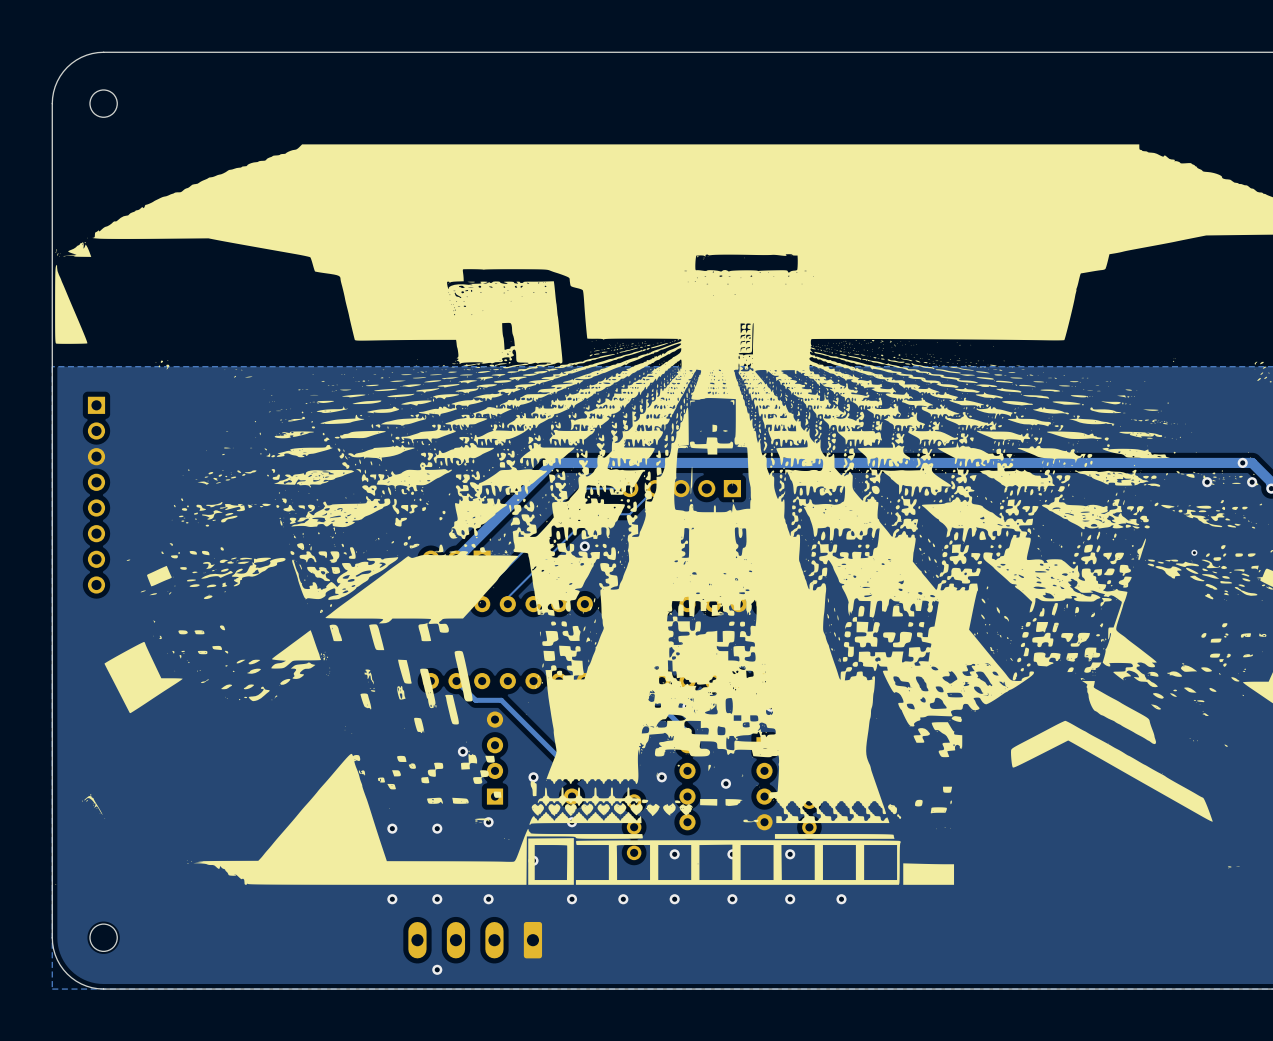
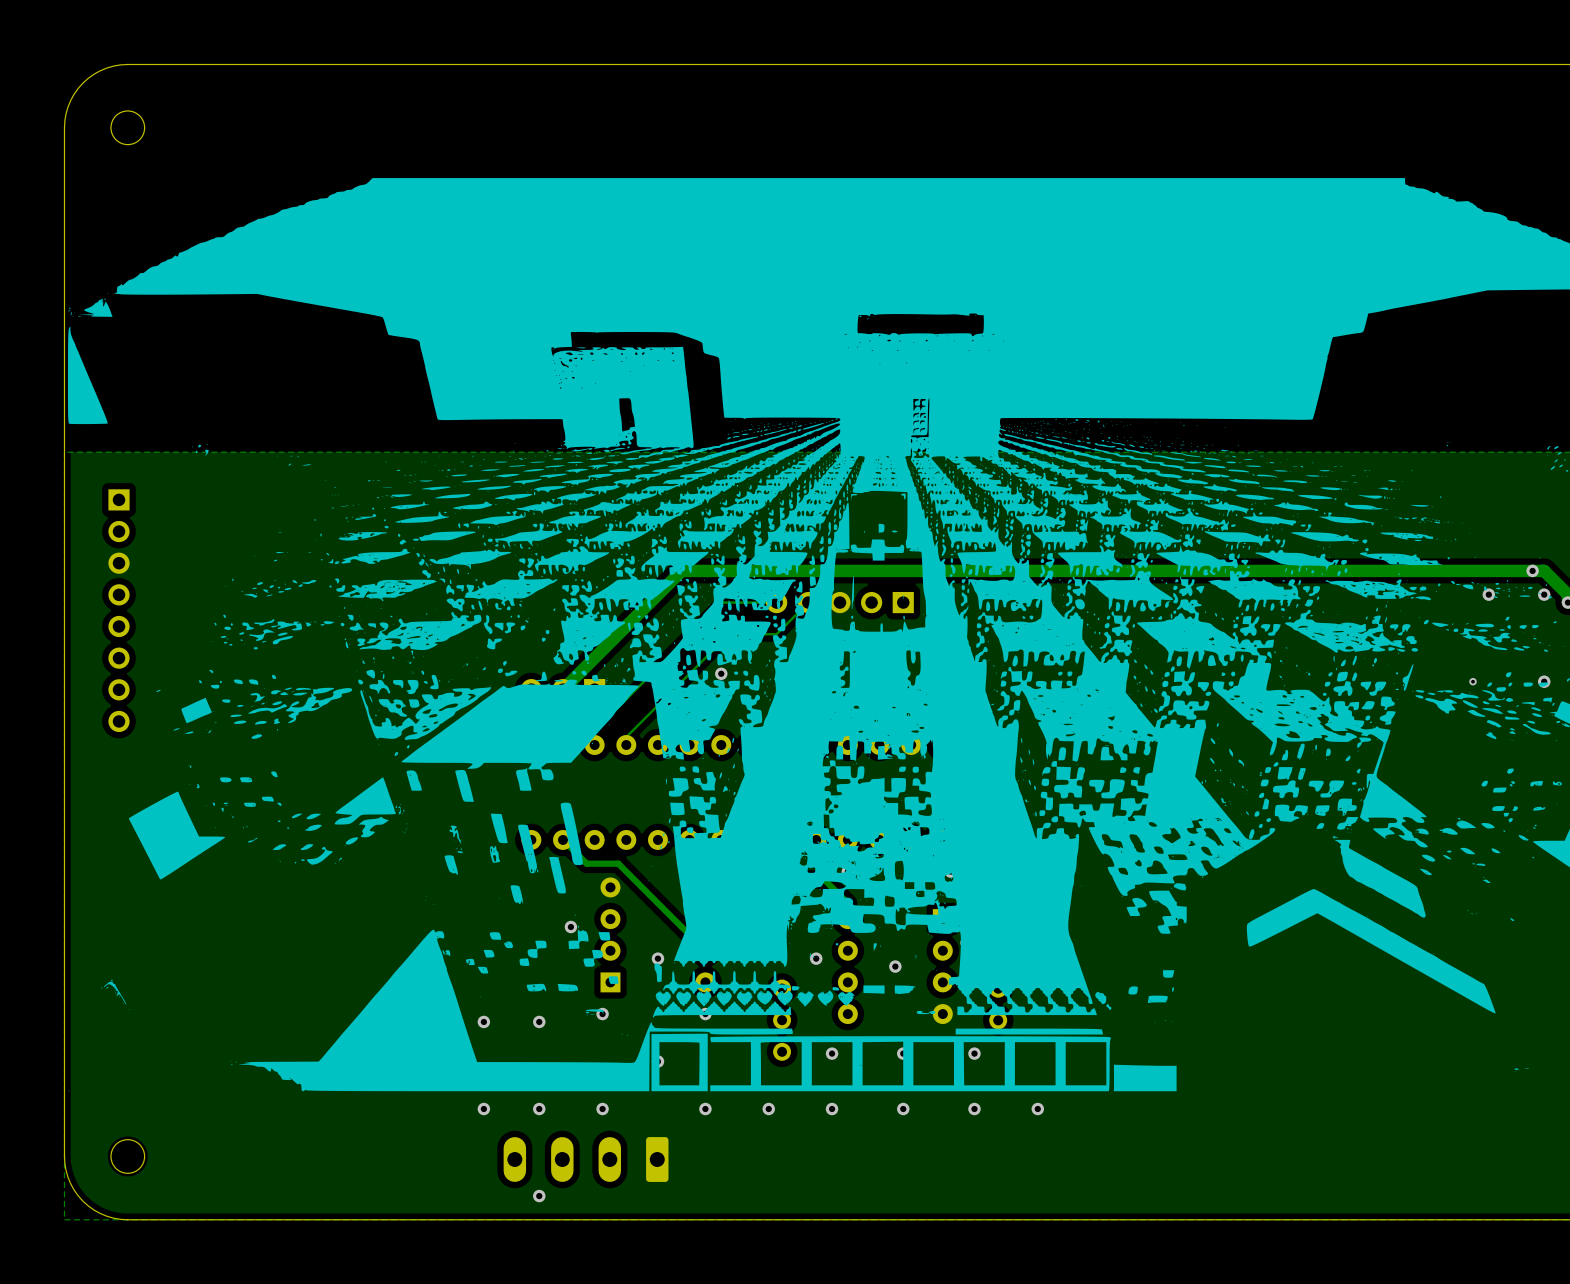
via: none -> (1544, 681)

